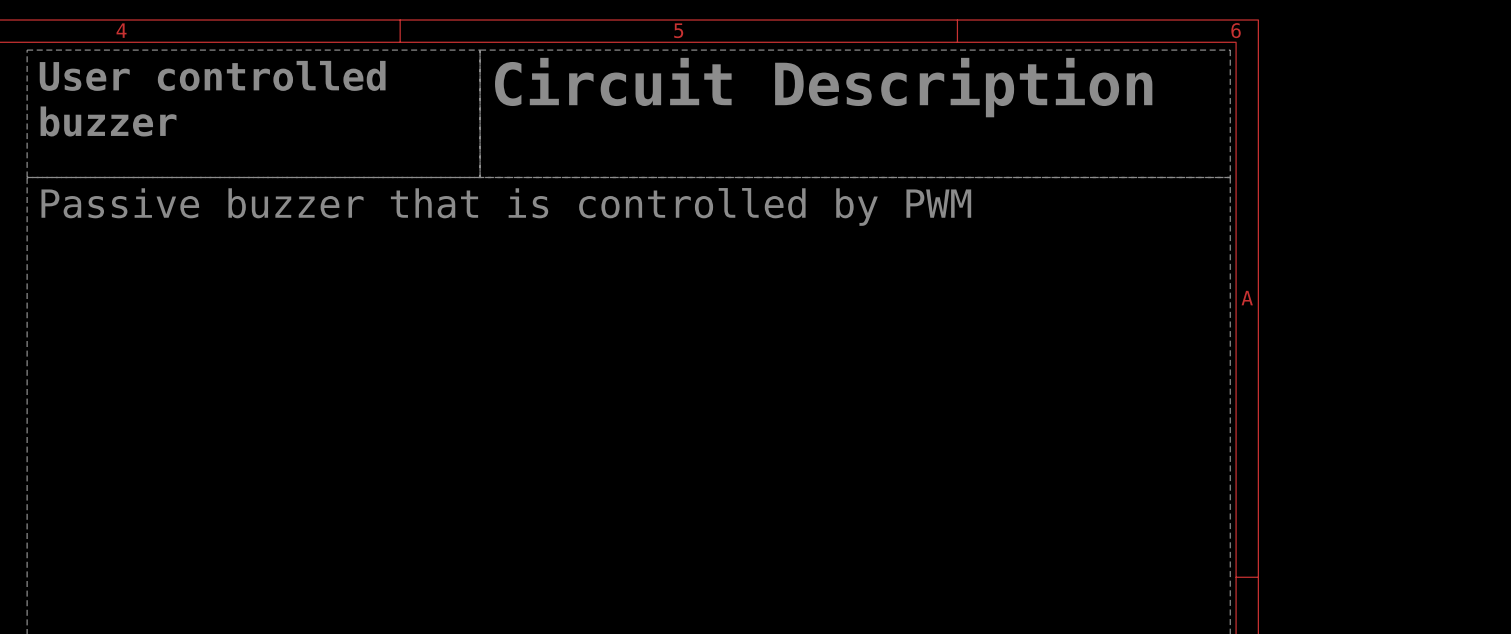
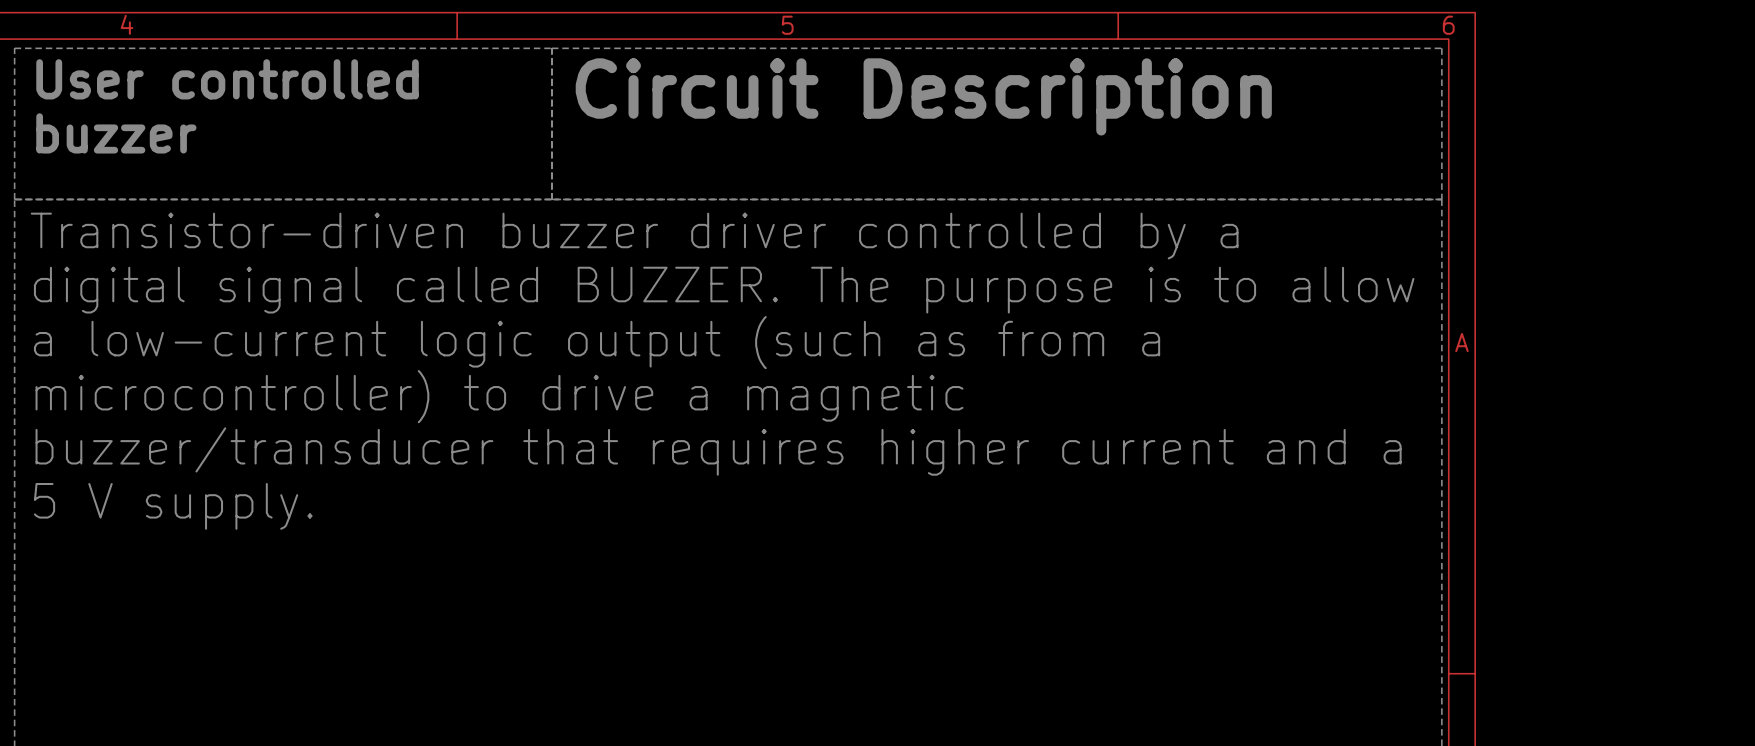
text: Passive buzzer that is controlled by PWM (506, 206) -> Transistor-driven buzzer driver controlled by a (634, 236)
text: none -> digital signal called BUZZER. The purpose is to allow (724, 290)
text: none -> a low-current logic output (such as from a (597, 342)
text: none -> microcontroller) to drive a magnetic (499, 396)
text: none -> buzzer/transducer that requires higher current and a (718, 451)
text: none -> 5 V supply. (173, 506)

